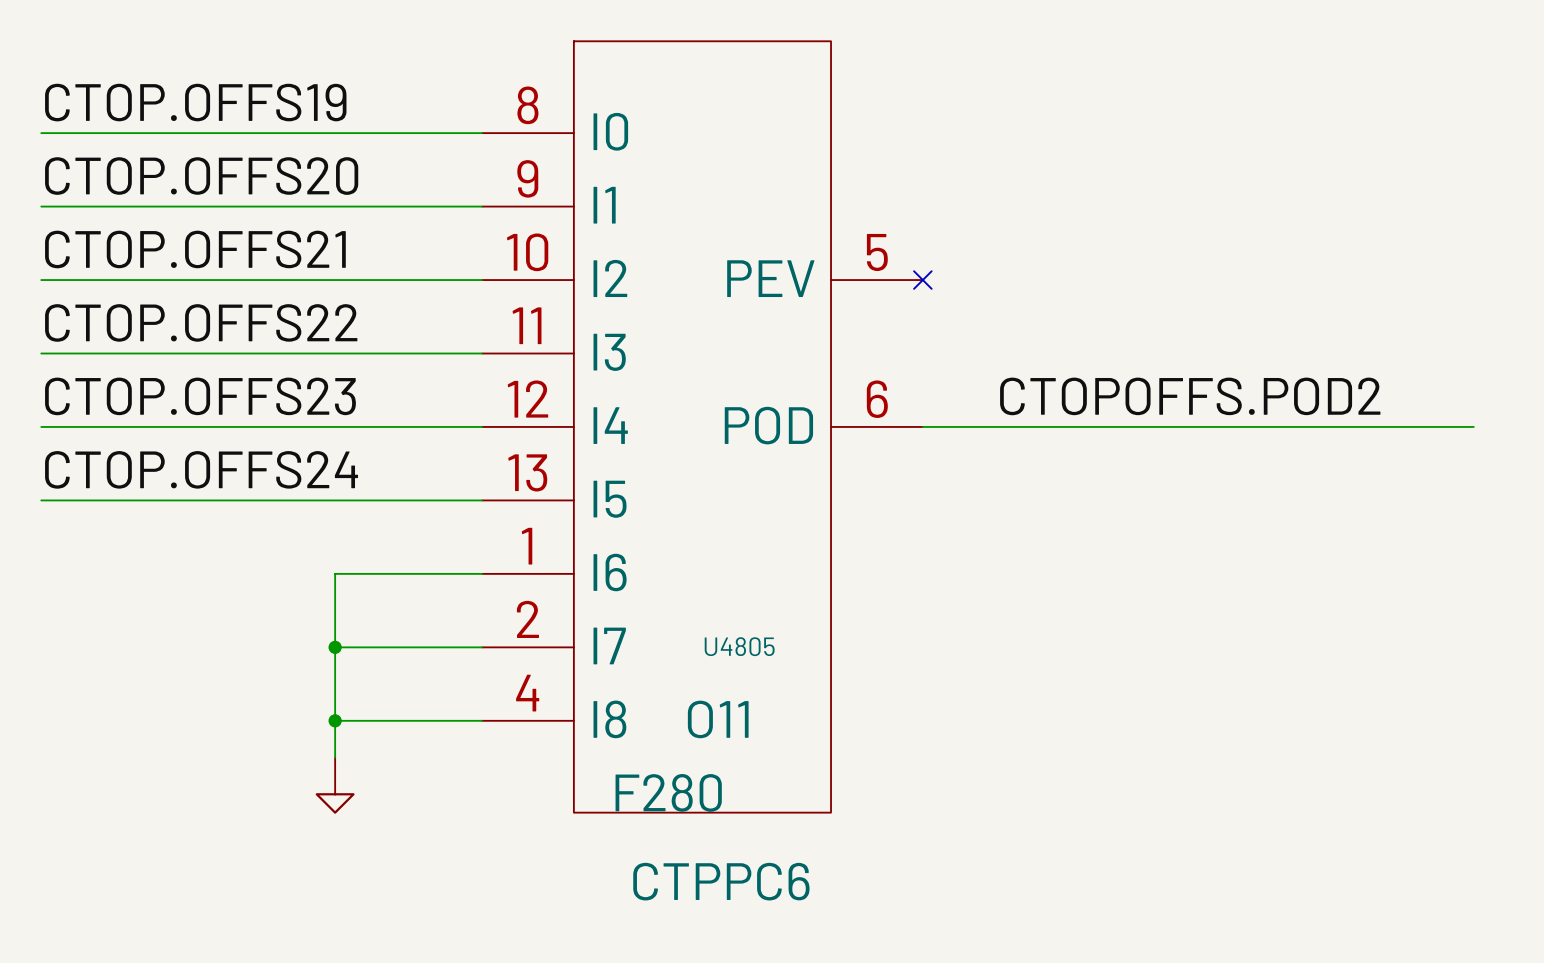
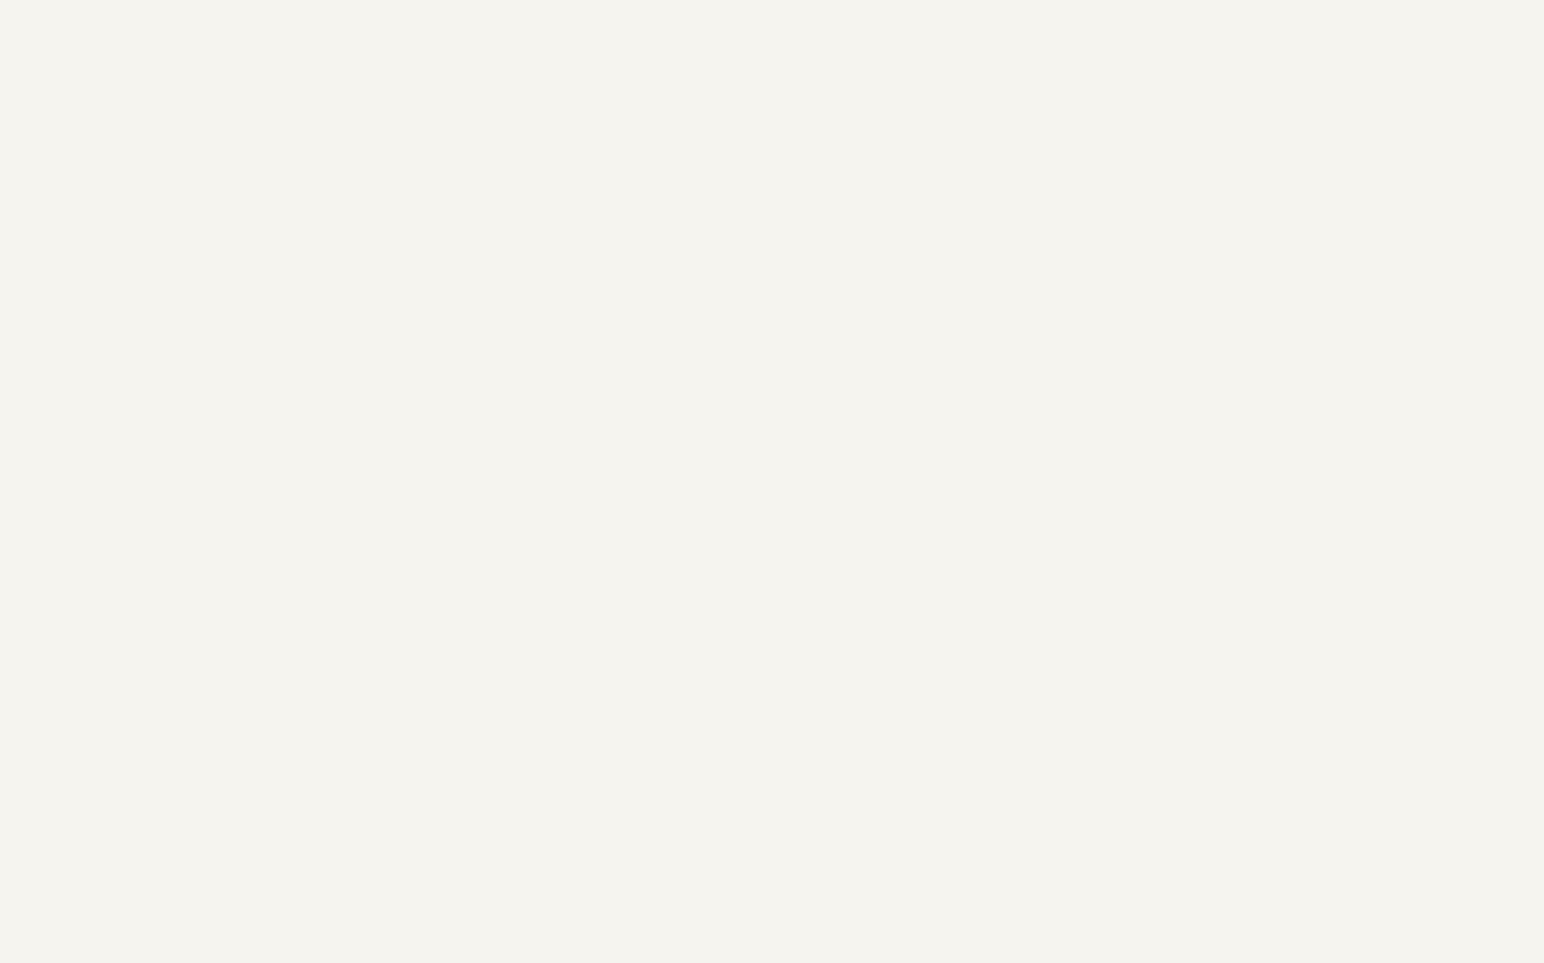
label: CTOP.OFFS19 (195, 102) -> none
wire: (41, 133) (482, 133) -> none
label: CTOP.OFFS20 (201, 176) -> none
wire: (41, 206) (482, 206) -> none
label: CTOP.OFFS21 (195, 249) -> none
wire: (41, 280) (482, 280) -> none
no-connect mark: (922, 280) -> none
label: CTOP.OFFS22 (201, 322) -> none
wire: (41, 353) (482, 353) -> none
label: CTOP.OFFS23 (200, 396) -> none
label: CTOPOFFS.POD2 (1190, 396) -> none
wire: (41, 426) (482, 426) -> none
U4805: F280 (702, 426) -> none
wire: (922, 426) (1473, 426) -> none
label: CTOP.OFFS24 (201, 469) -> none
wire: (41, 500) (482, 500) -> none
wire: (482, 573) (335, 573) (335, 757) -> none
wire: (335, 647) (482, 647) -> none
junction: (335, 647) -> none
wire: (335, 720) (482, 720) -> none
junction: (335, 720) -> none
power symbol: (335, 785) -> none

